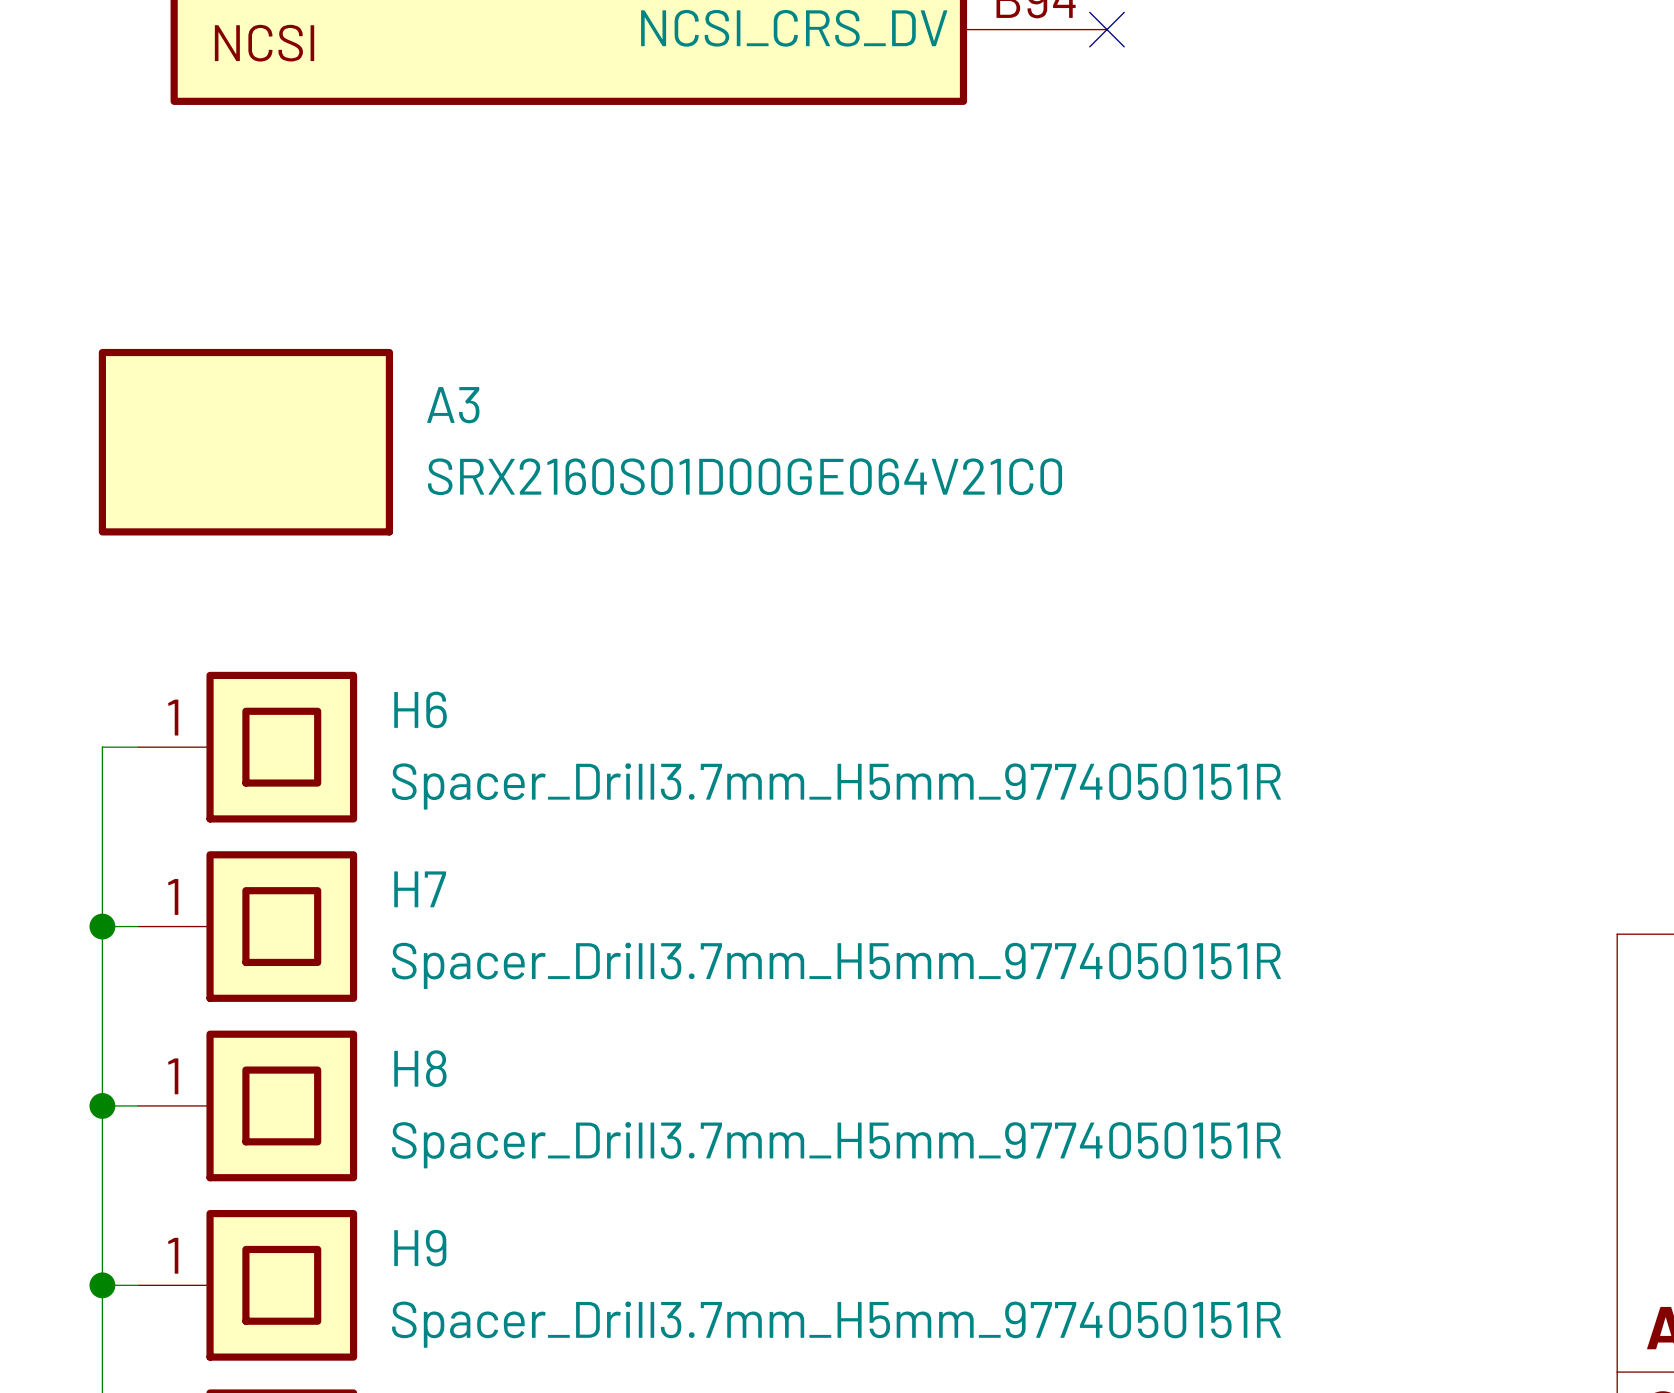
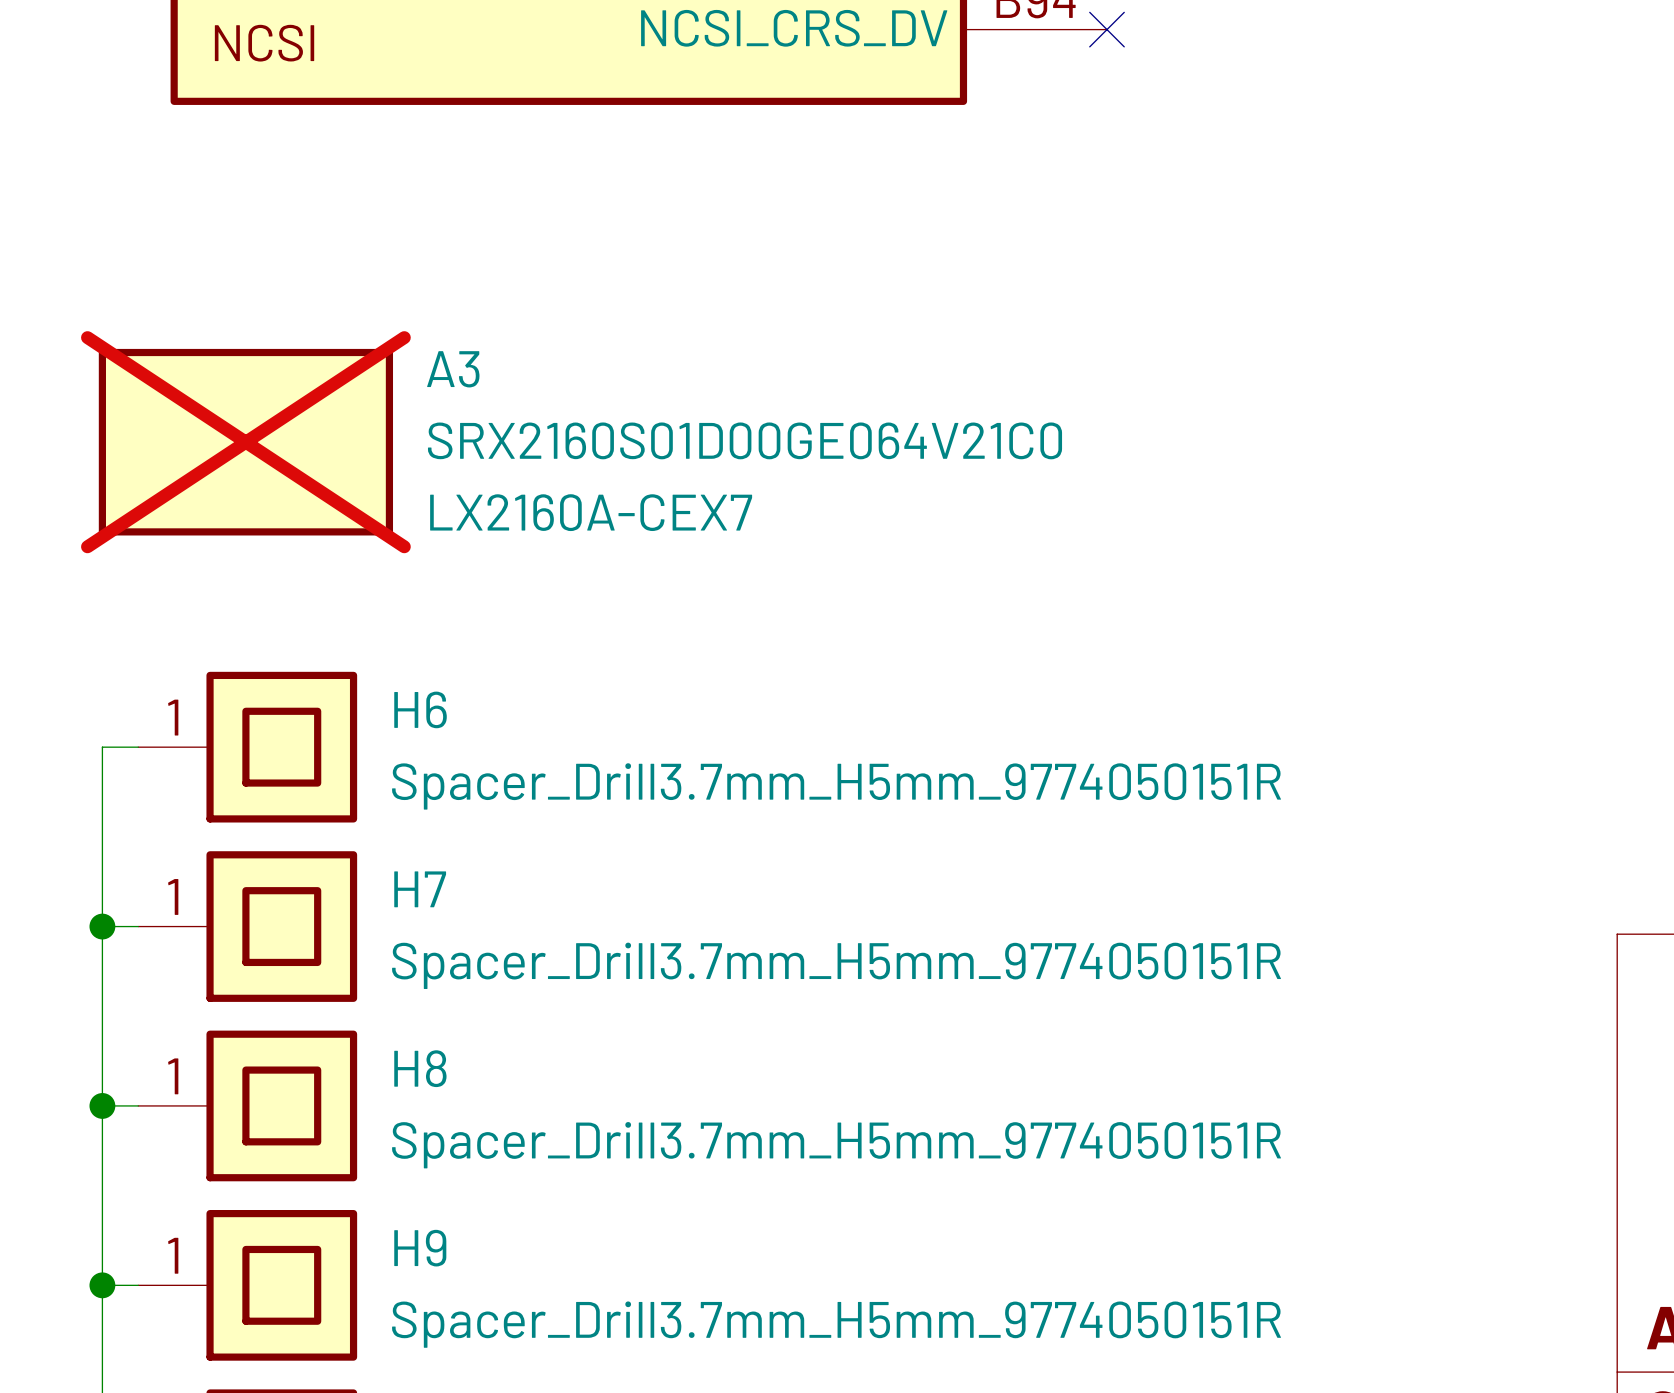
A3 name position: A3 (453, 405) -> A3 (453, 369)
A3 do-not-place cross: none -> (245, 442)
A3 text position: SRX2160S01D00GE064V21C0 (745, 476) -> SRX2160S01D00GE064V21C0 (745, 440)
A3 text: none -> LX2160A-CEX7 (591, 512)

